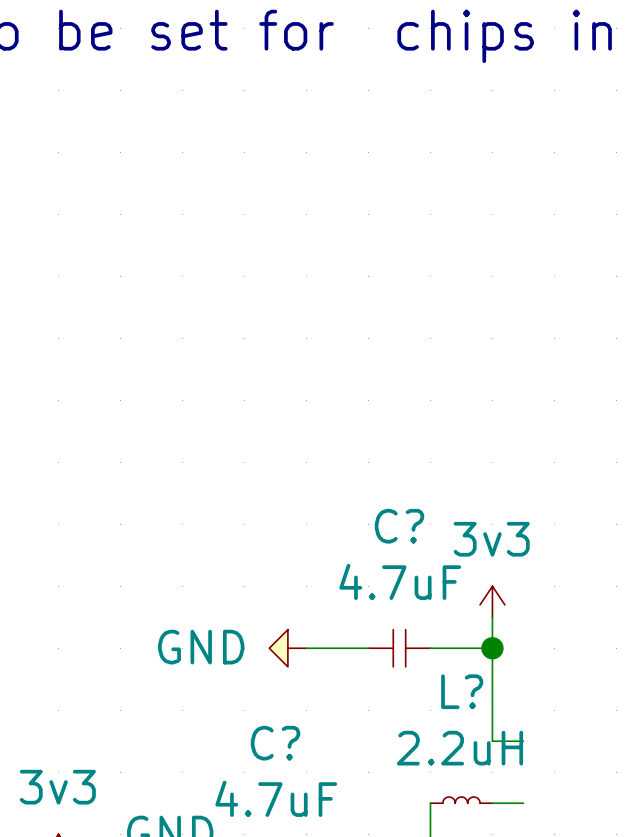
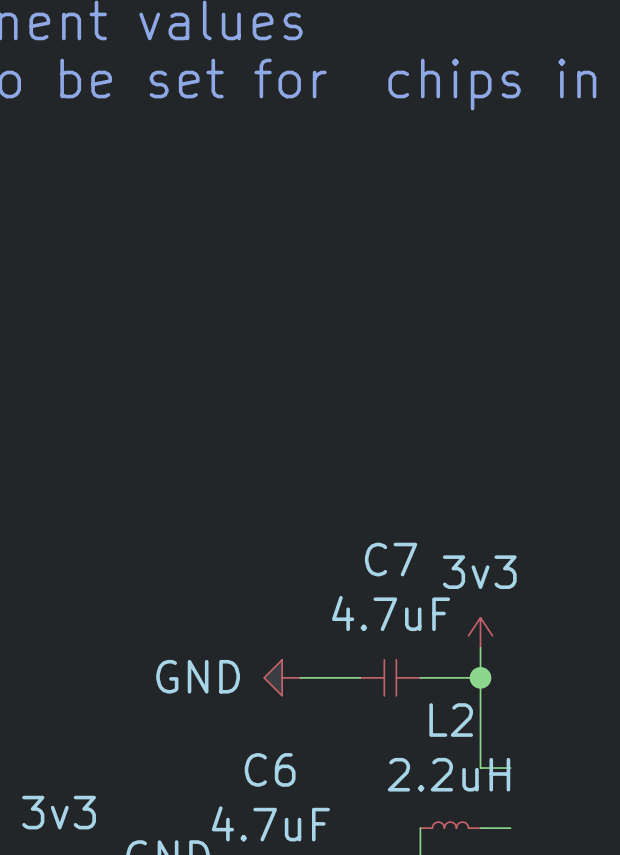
C? name: C? (399, 526) -> C7 (391, 559)
L? name: L? (462, 691) -> L2 (451, 720)
C? name: C? (275, 743) -> C6 (270, 769)

